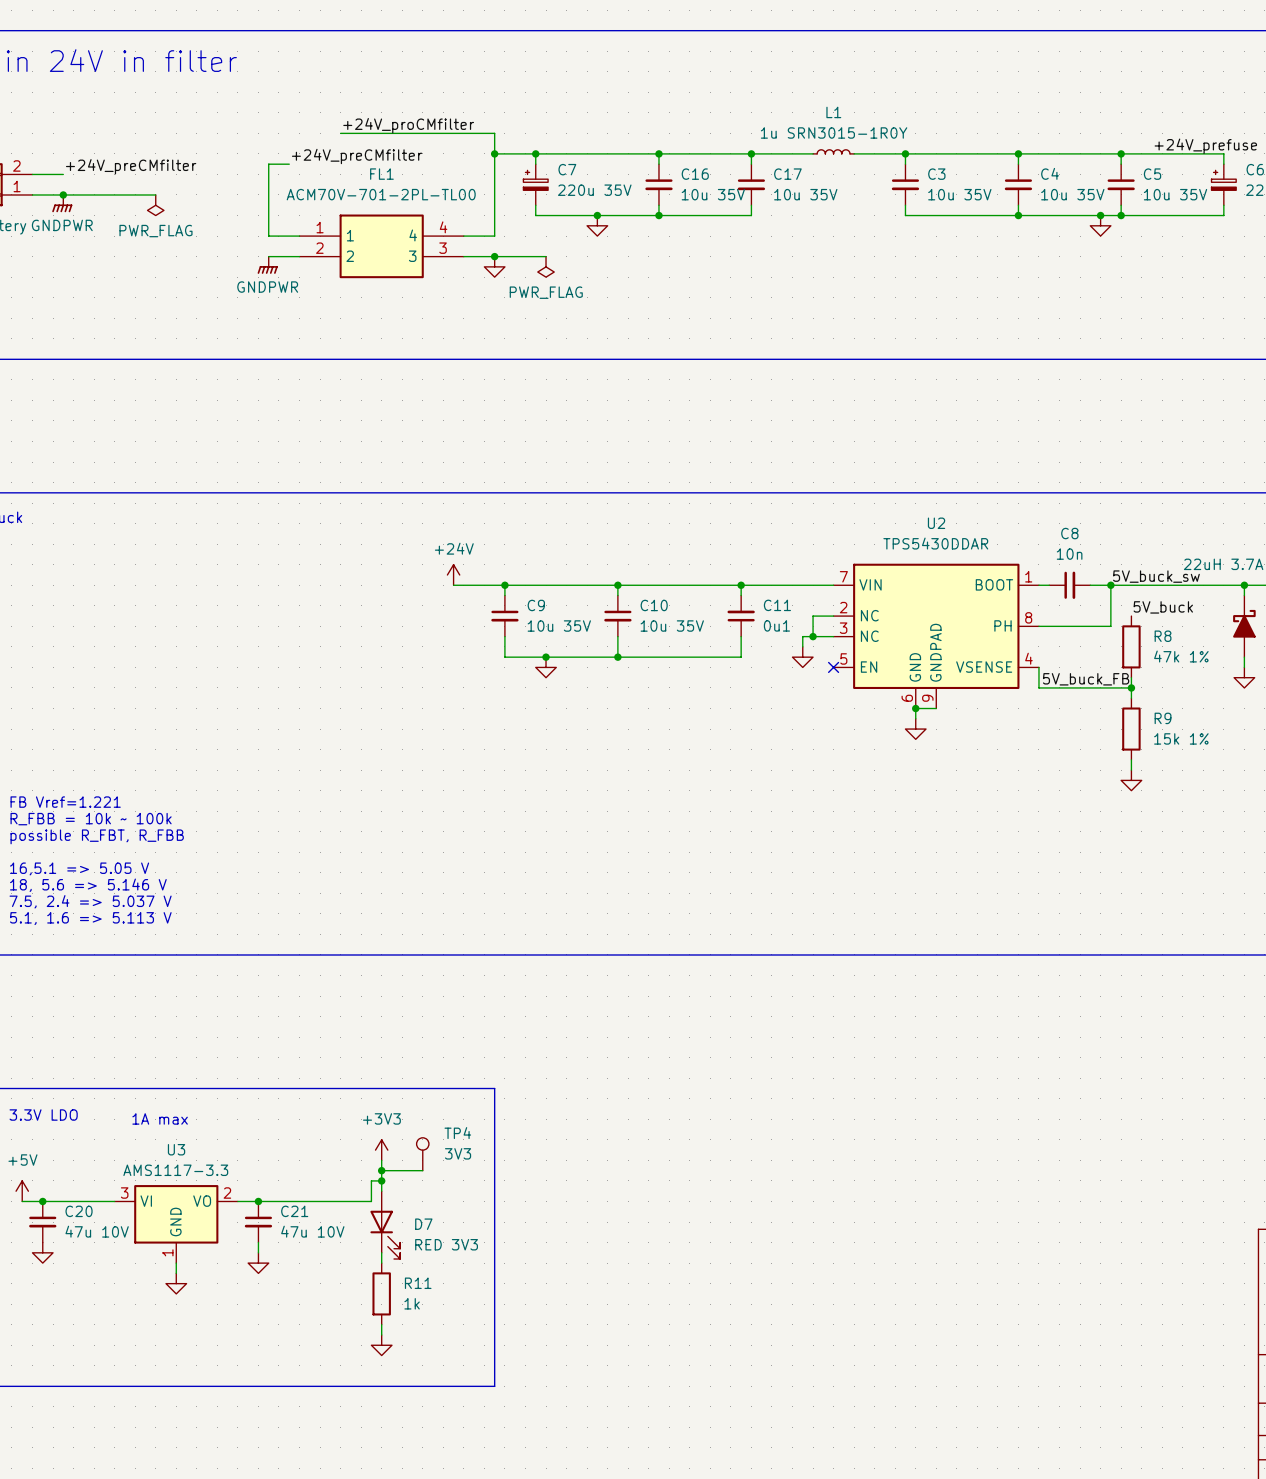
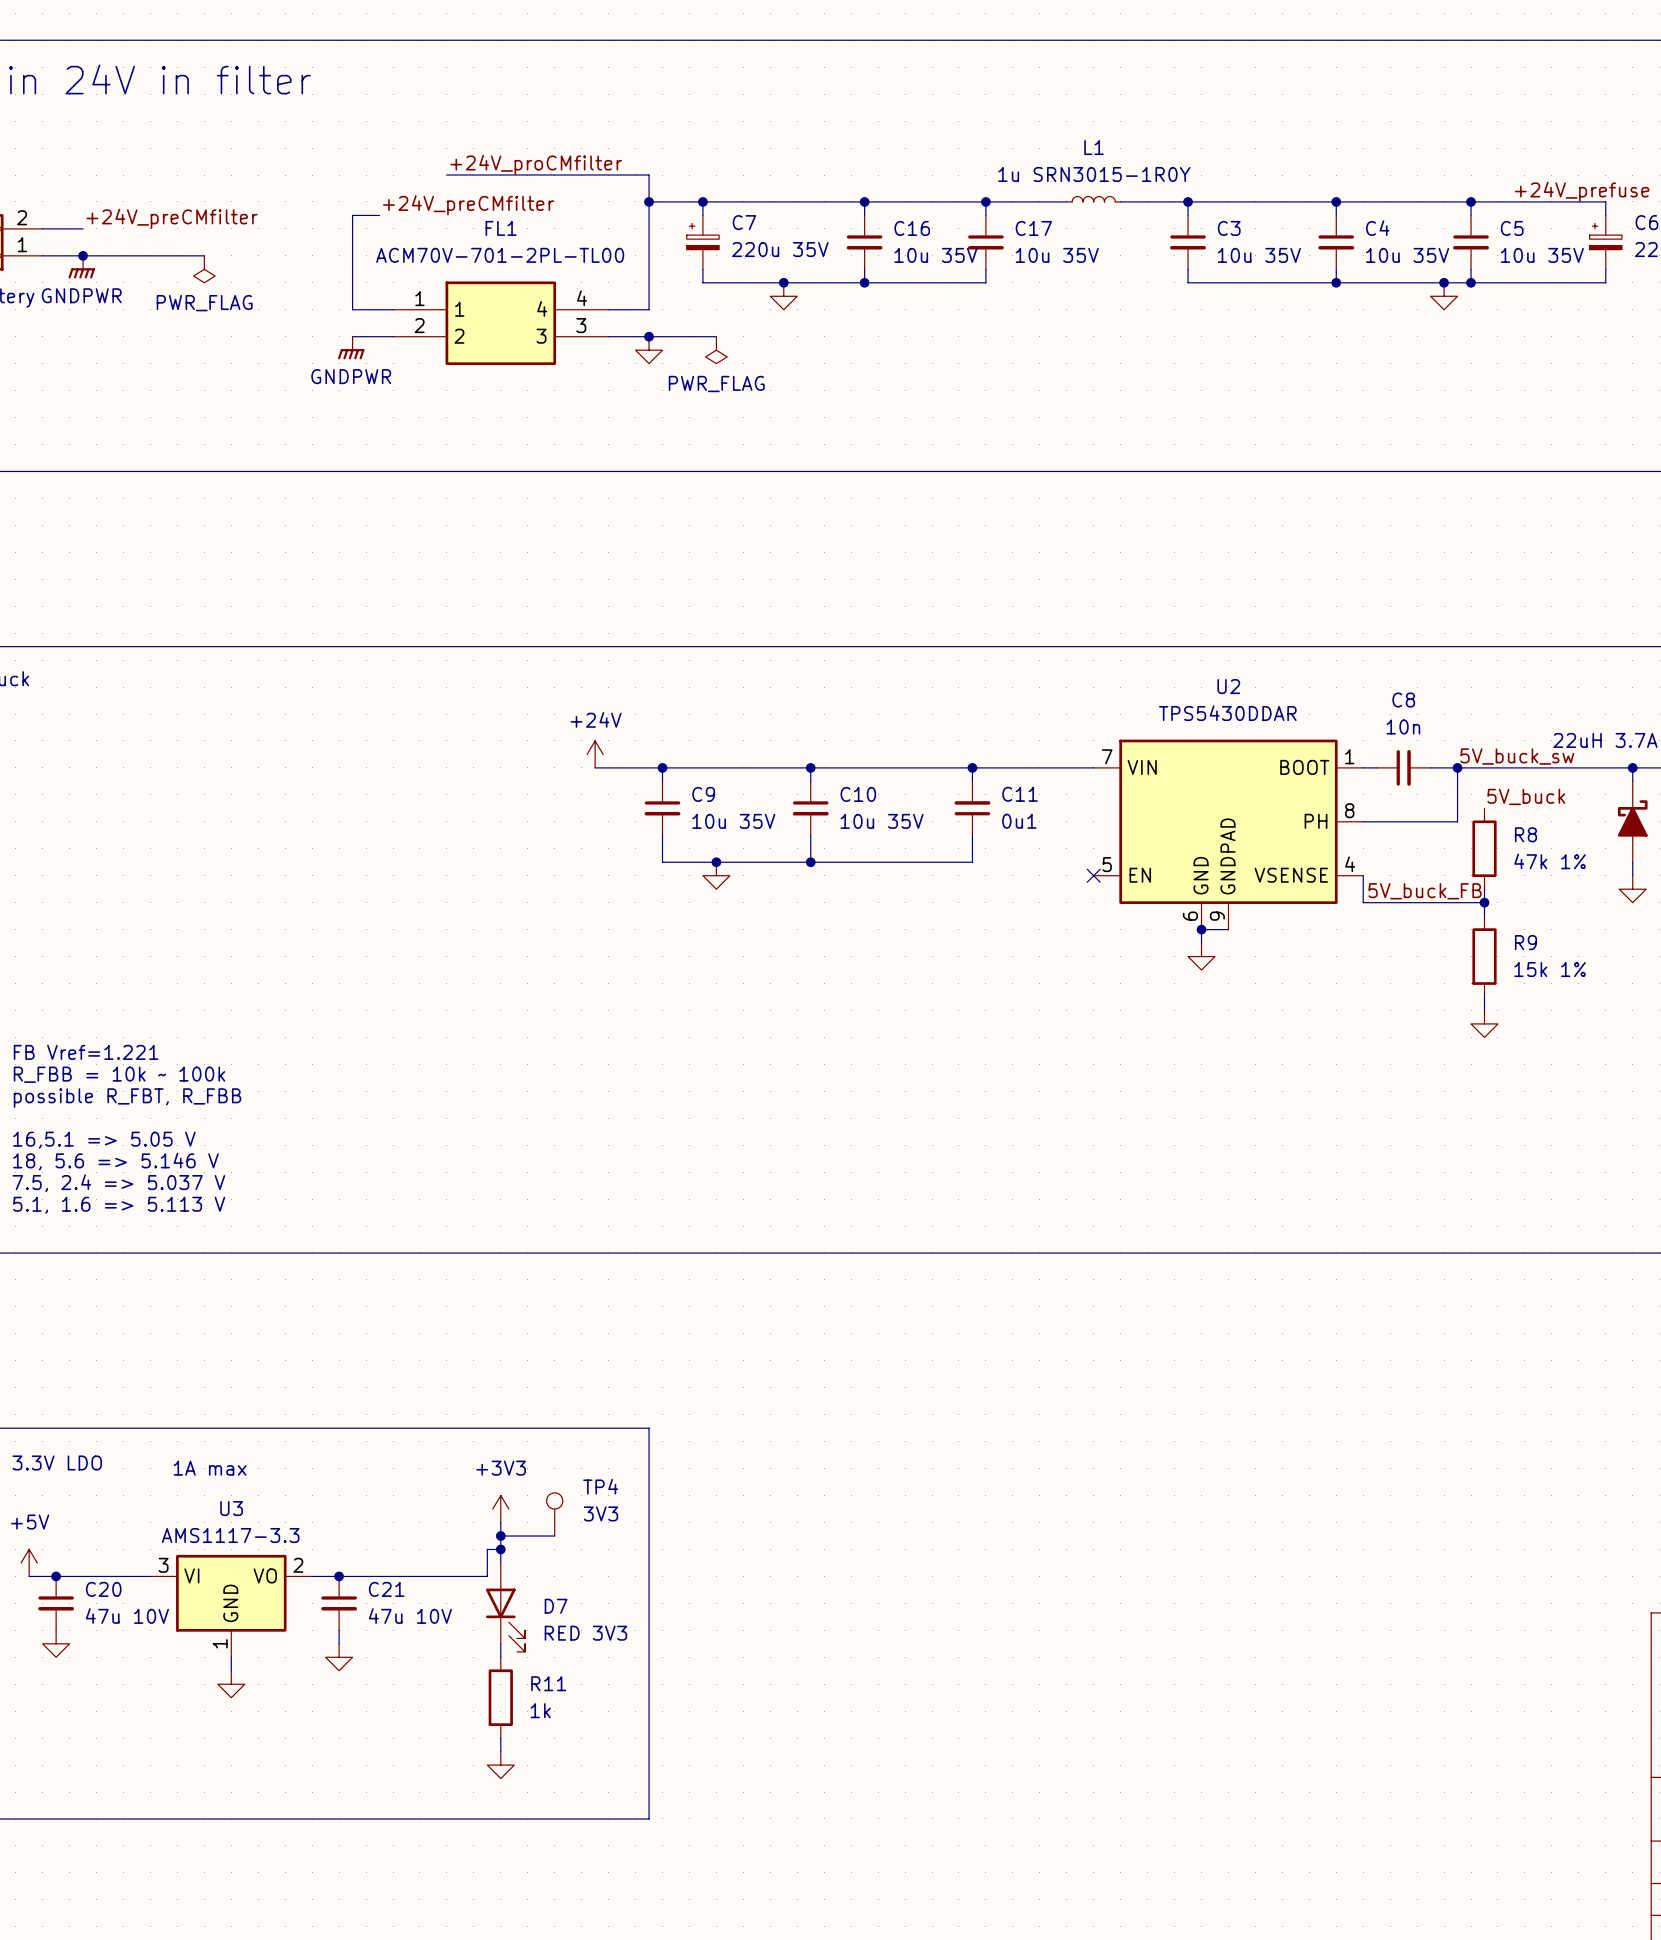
U2 symbol: [833, 563, 1039, 709] -> [1093, 739, 1364, 930]
wire: (833, 616) (813, 616) (813, 636) -> none
junction: (813, 636) -> none
wire: (833, 636) (802, 636) (802, 646) -> none
power symbol: (802, 657) -> none

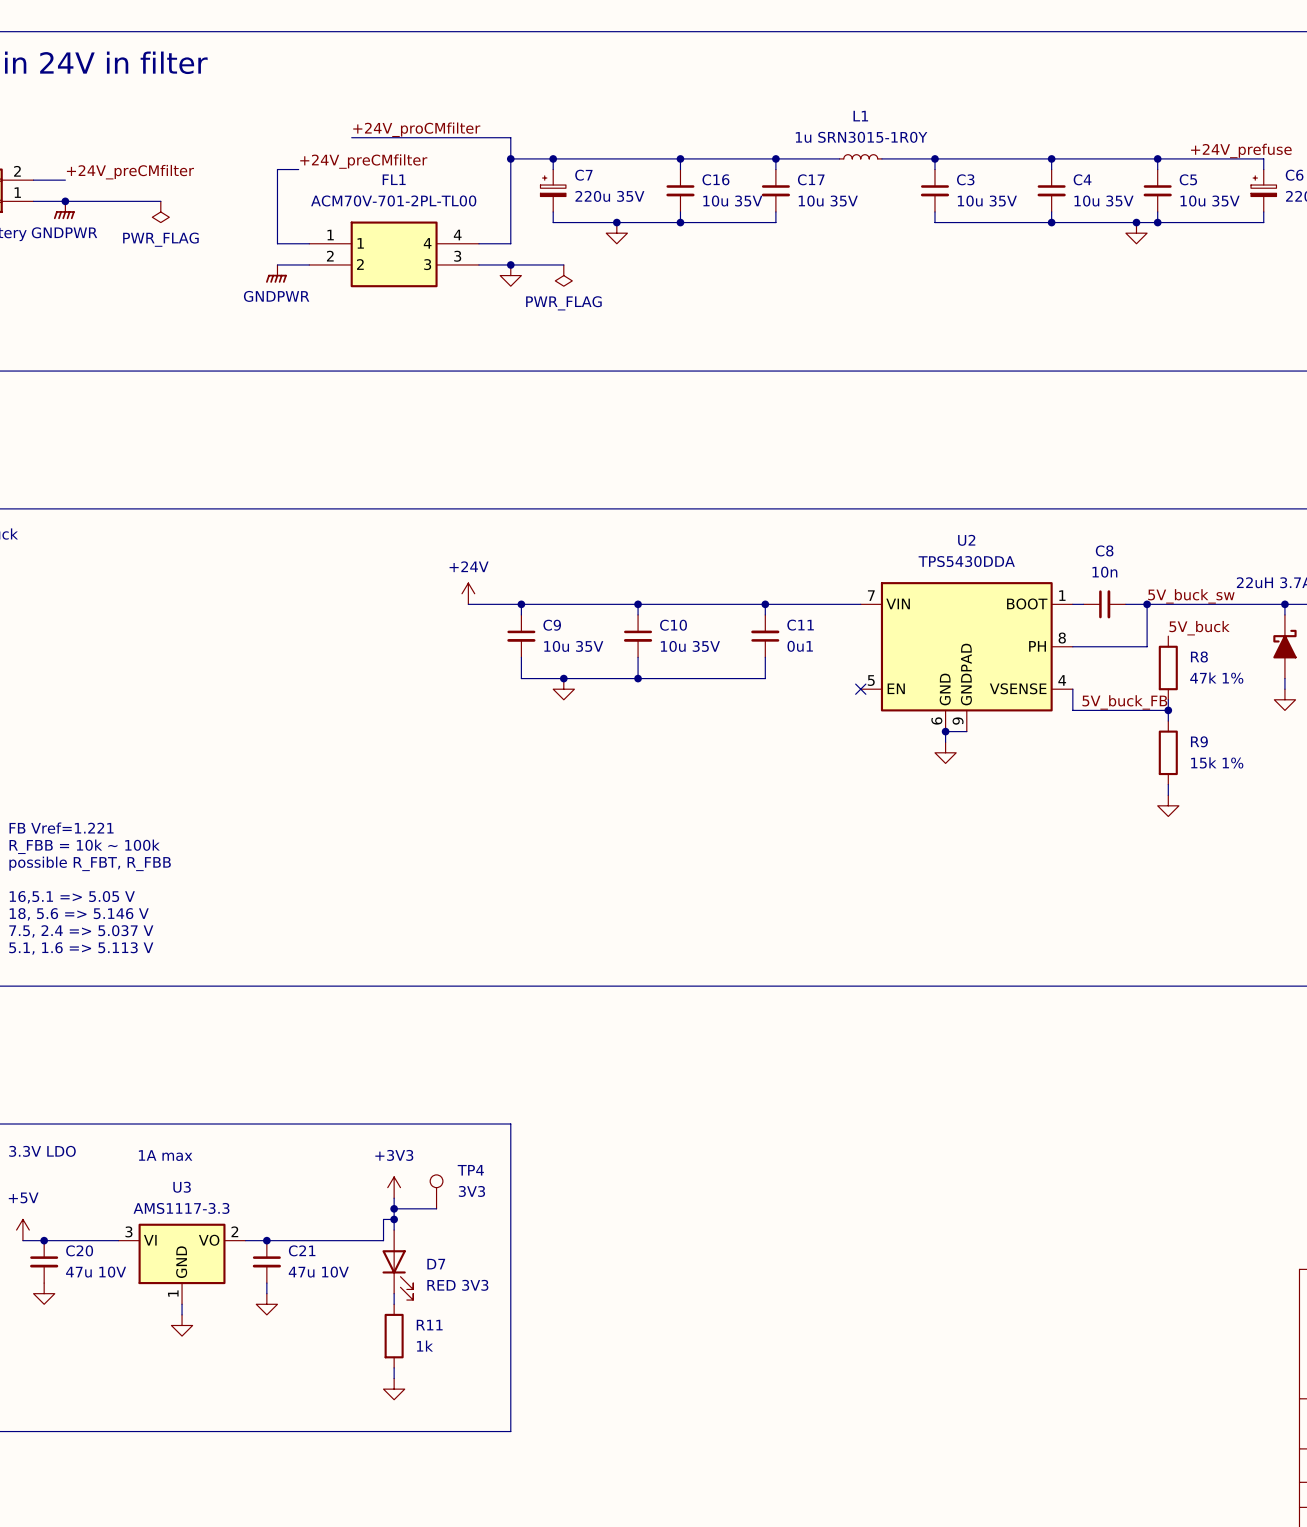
U2 value: TPS5430DDAR (1227, 713) -> TPS5430DDA (966, 561)

